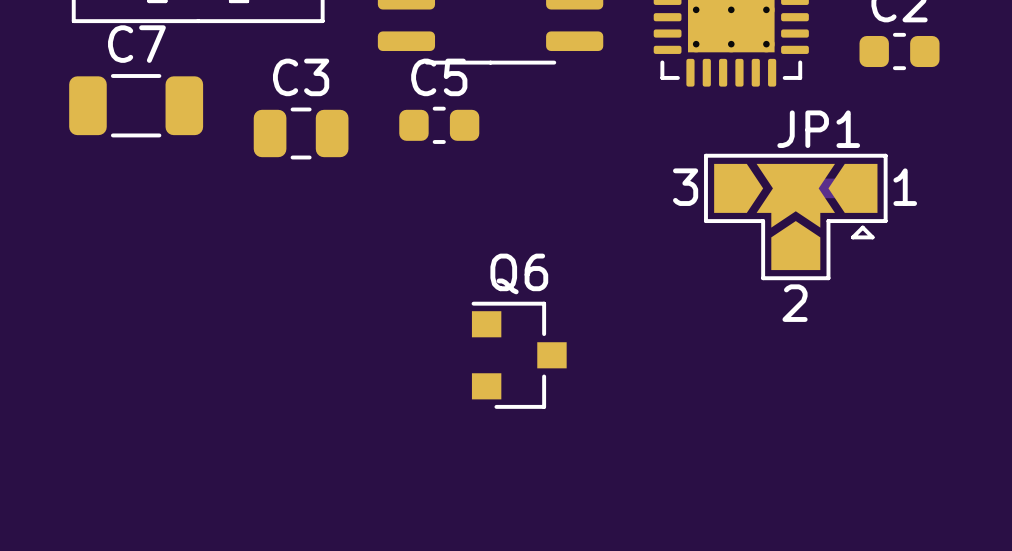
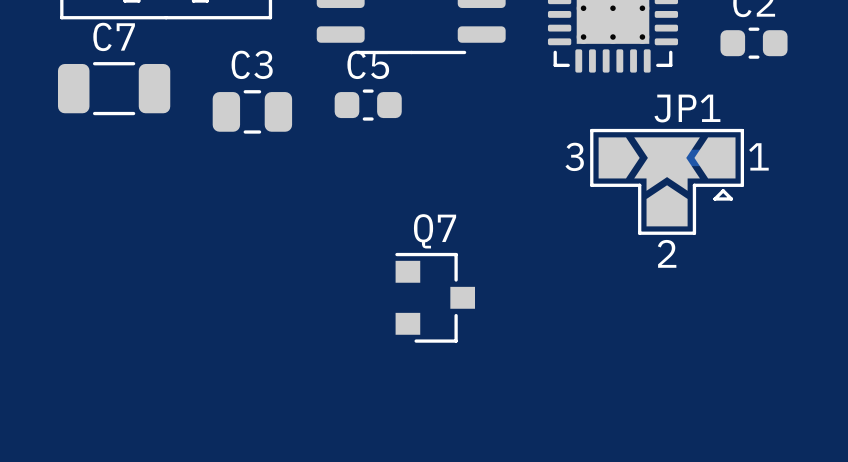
Q6 name: Q6 (519, 273) -> Q7 (435, 231)

